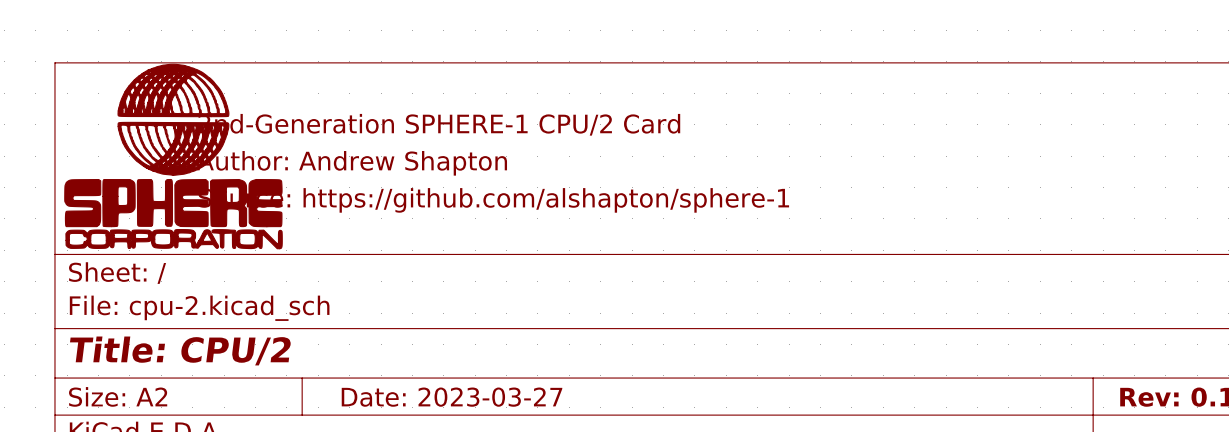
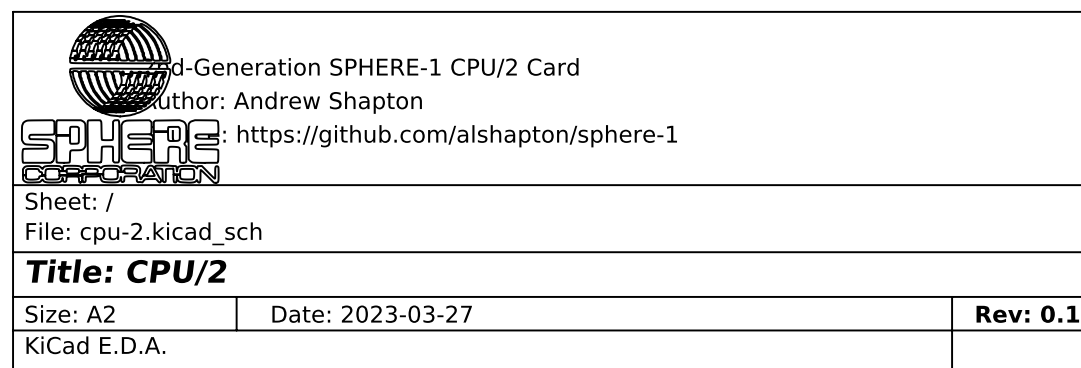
power symbol shape: [64, 64, 283, 249] -> [21, 15, 219, 183]

